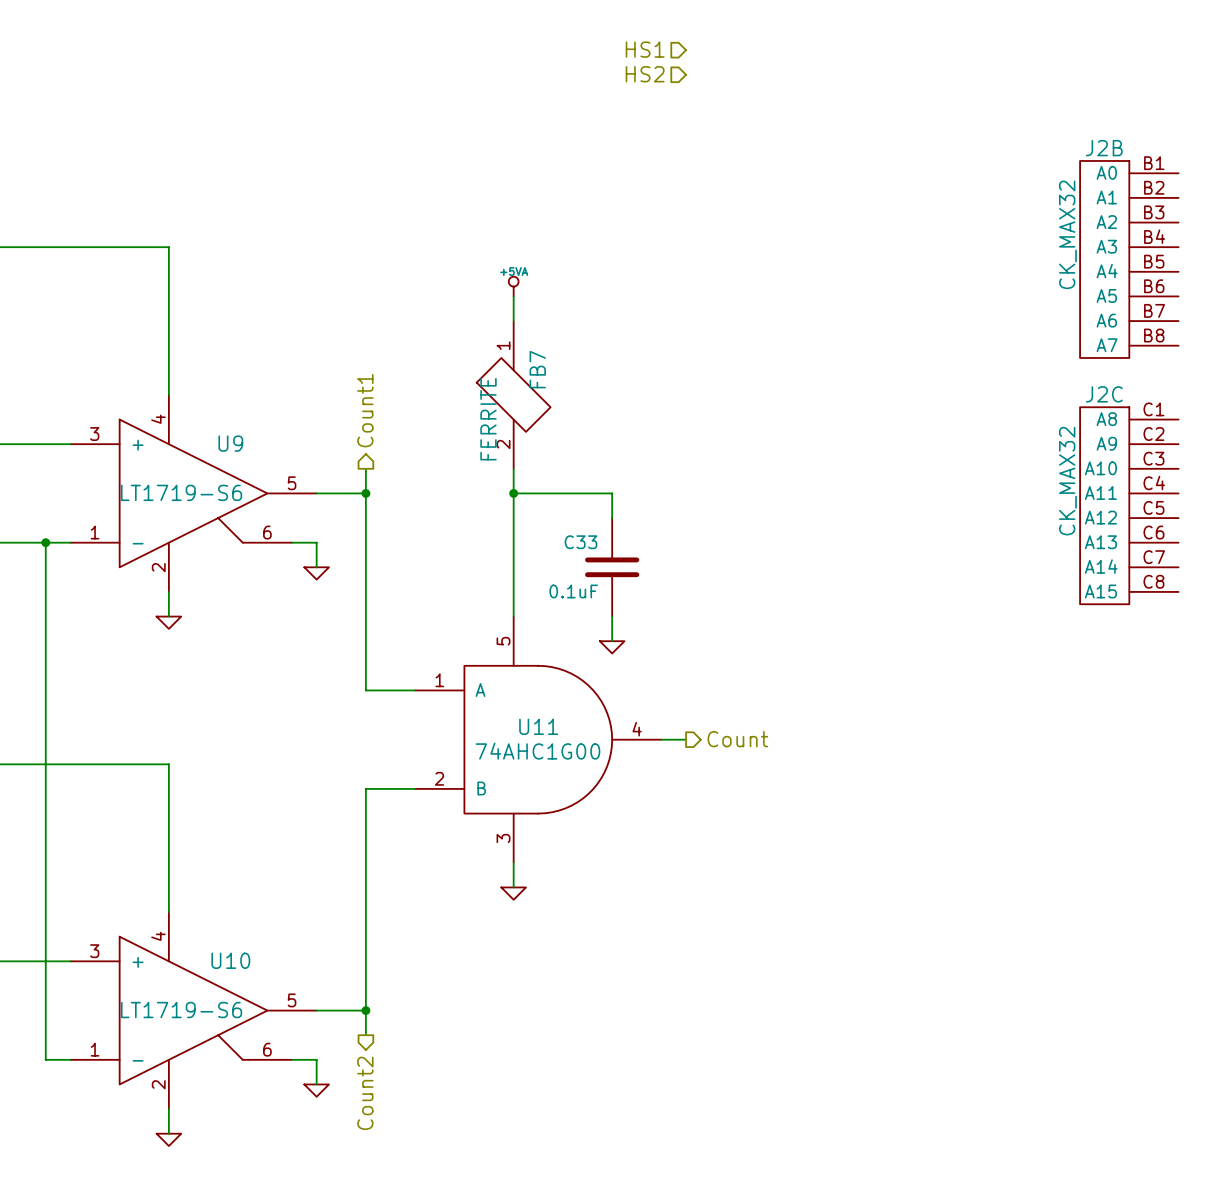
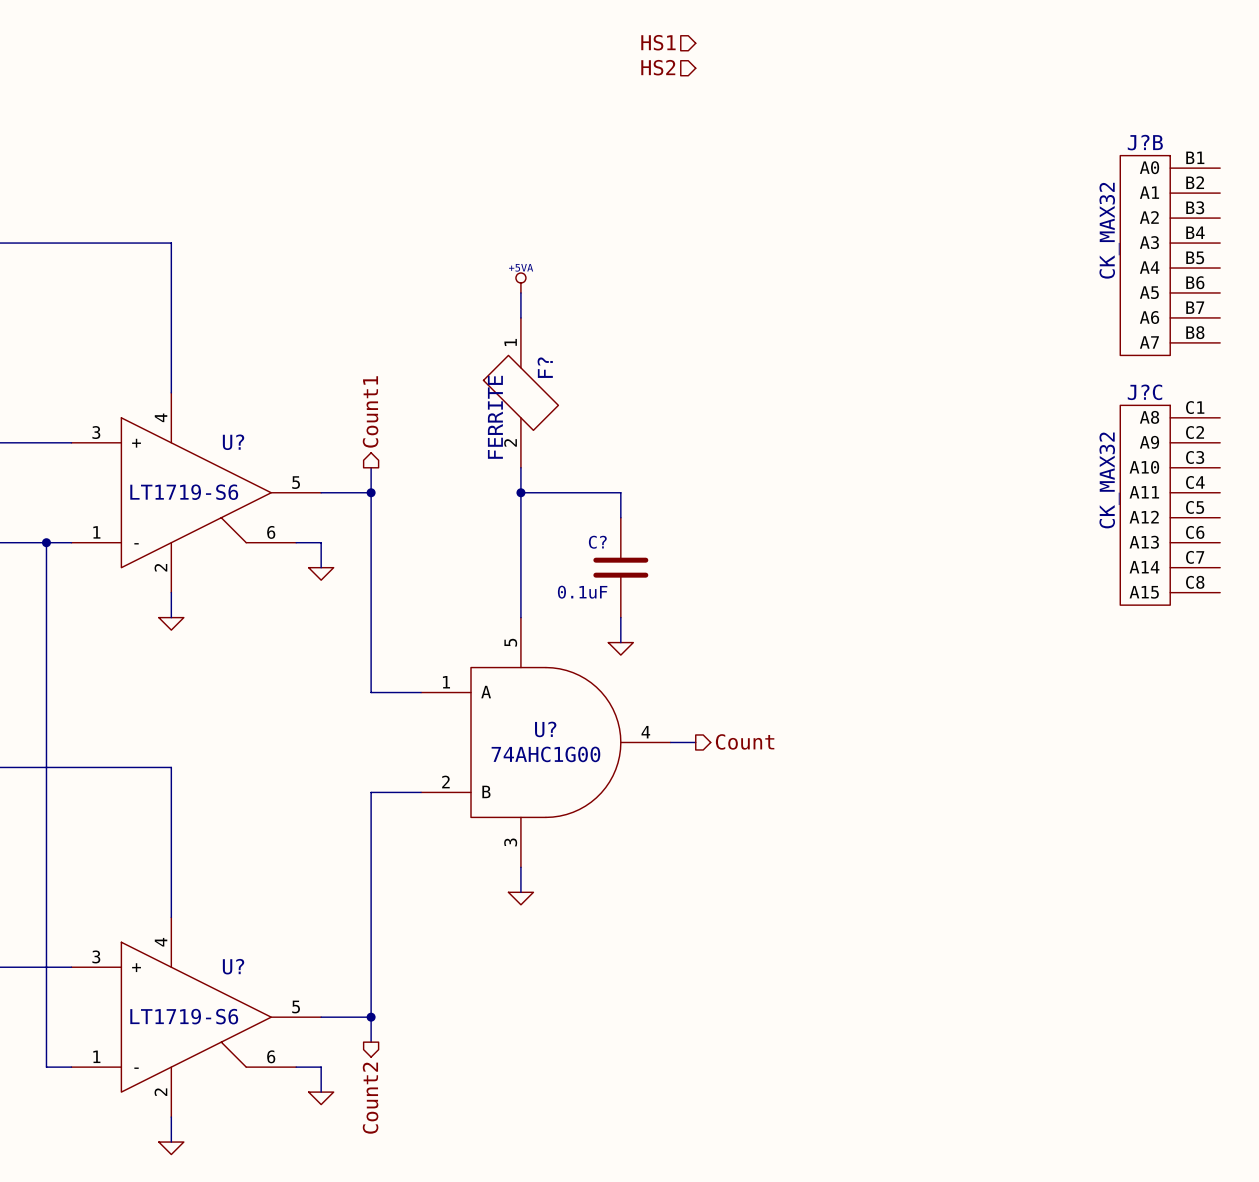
J2B: CK_MAX32 (1129, 259) -> none
J?B: none -> CK_MAX32 (1170, 255)
FB7 name: FB7 (537, 369) -> F? (545, 367)
U9 name: U9 (230, 443) -> U? (233, 442)
J2C: CK_MAX32 (1129, 505) -> none
J?C: none -> CK_MAX32 (1170, 505)
C33 name: C33 (581, 542) -> C? (597, 542)
U11 name: U11 (538, 726) -> U? (545, 729)
U10 name: U10 (230, 960) -> U? (233, 966)

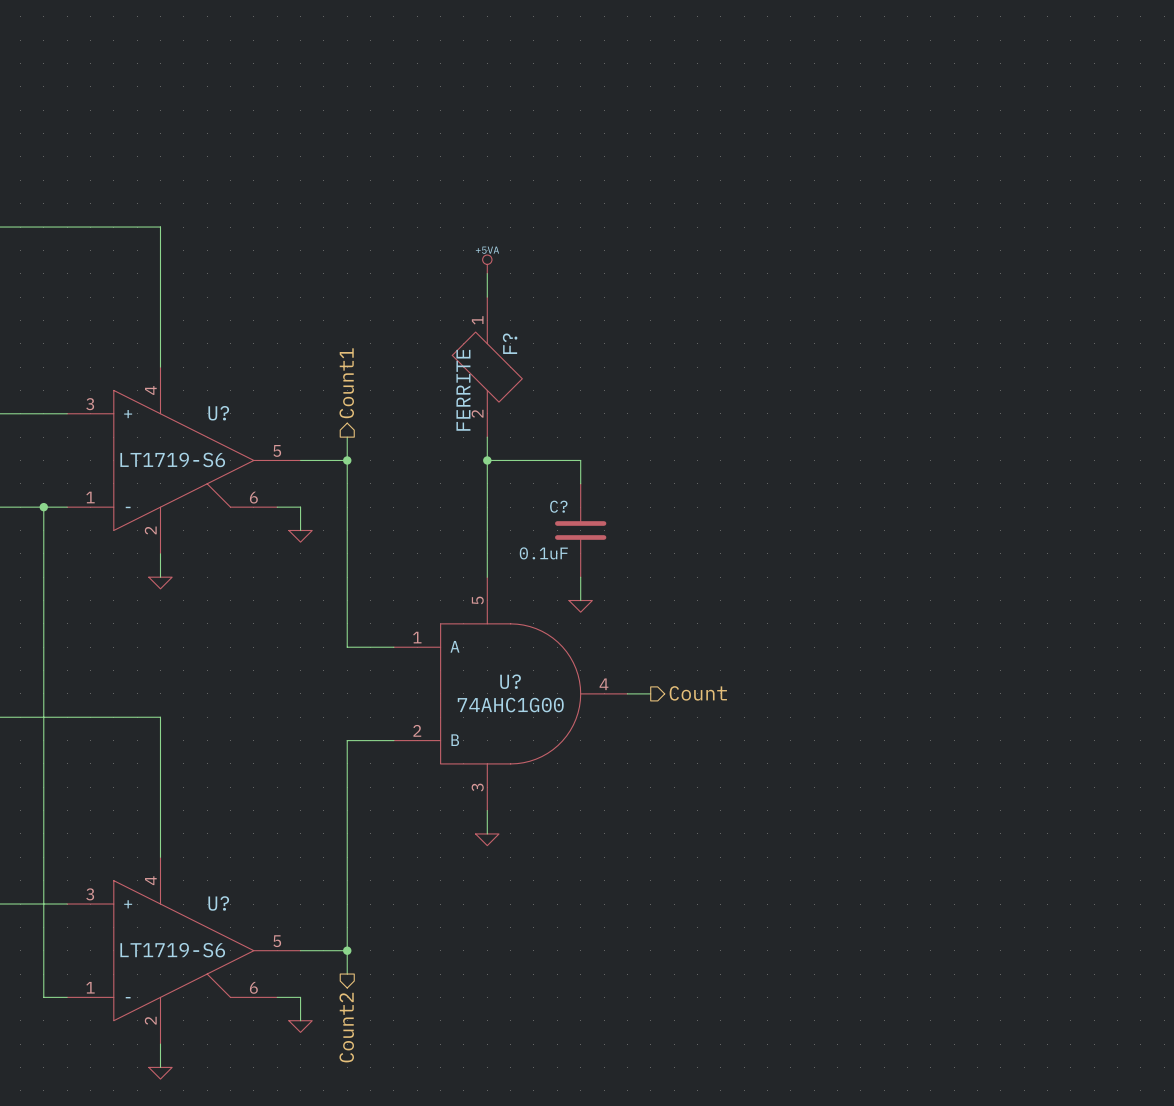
hierarchical label: HS1 (658, 42) -> none
hierarchical label: HS2 (658, 67) -> none
J?B: CK_MAX32 (1170, 255) -> none
J?C: CK_MAX32 (1170, 505) -> none

